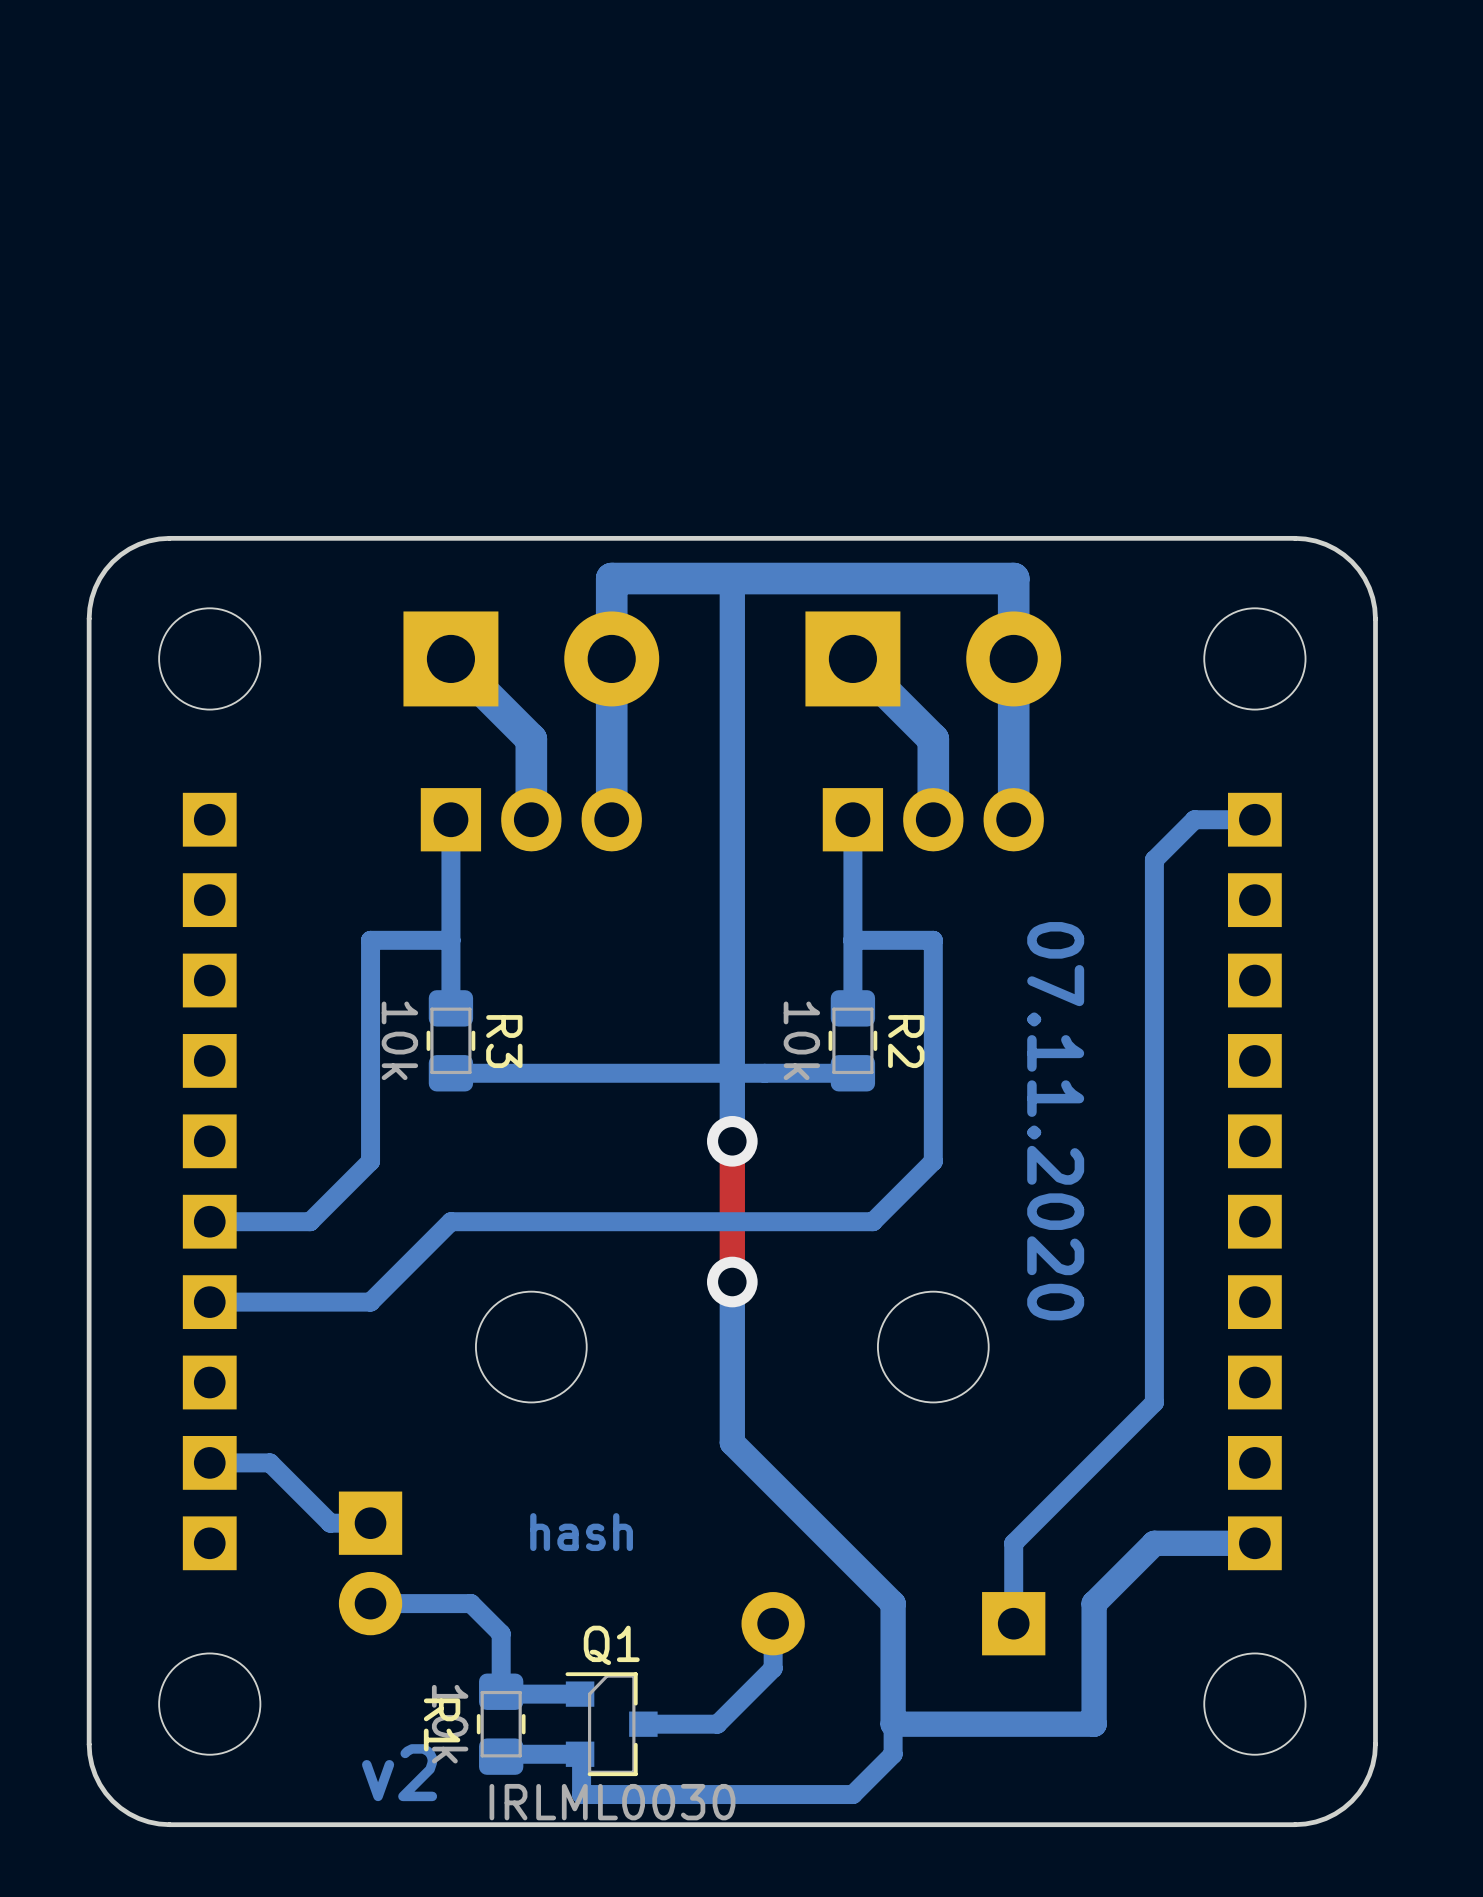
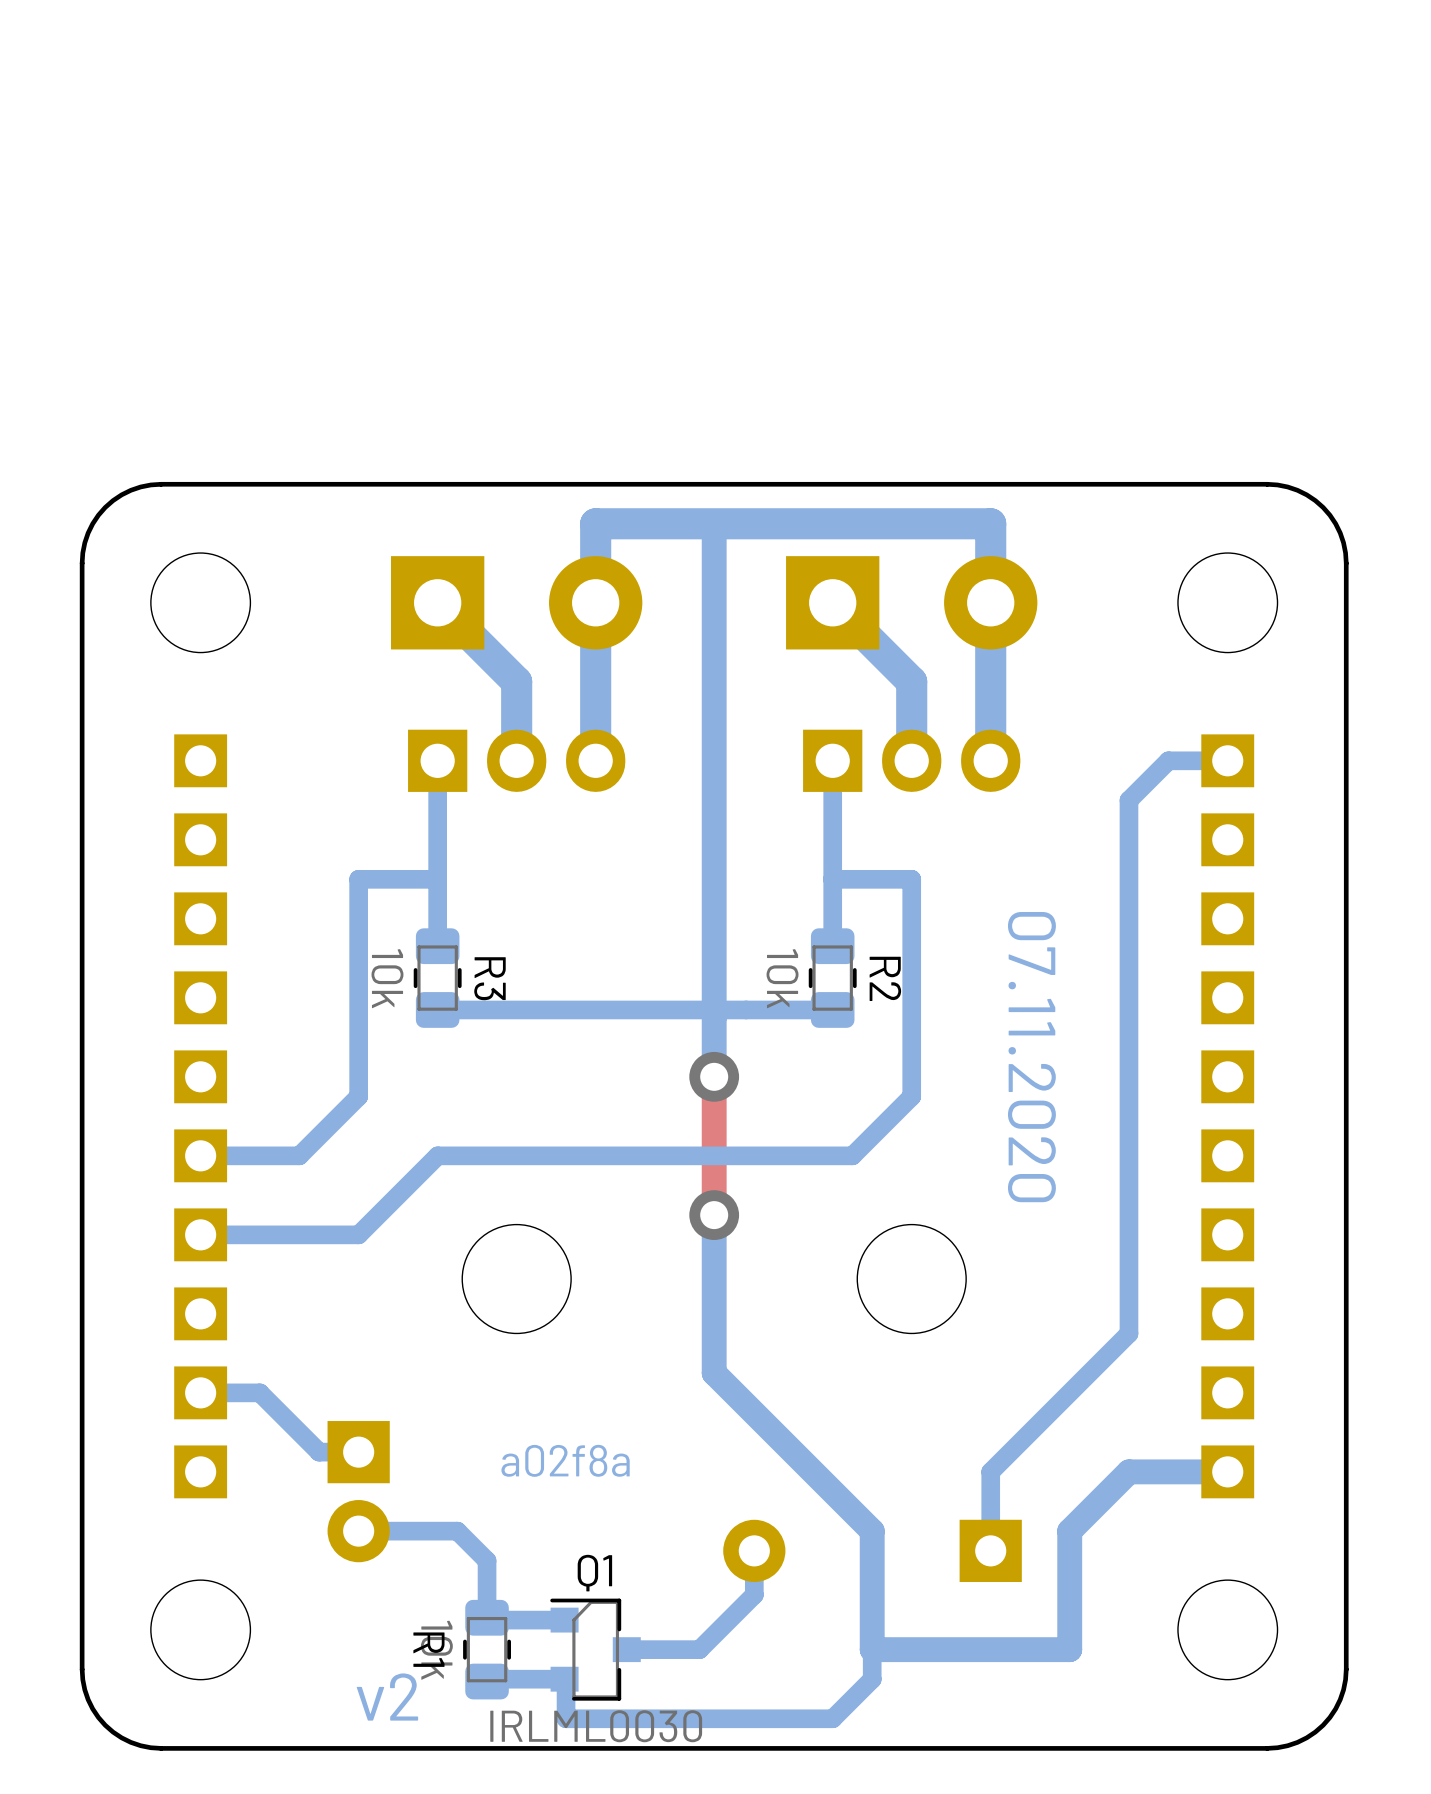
text: hash (581, 1532) -> a02f8a (565, 1460)

